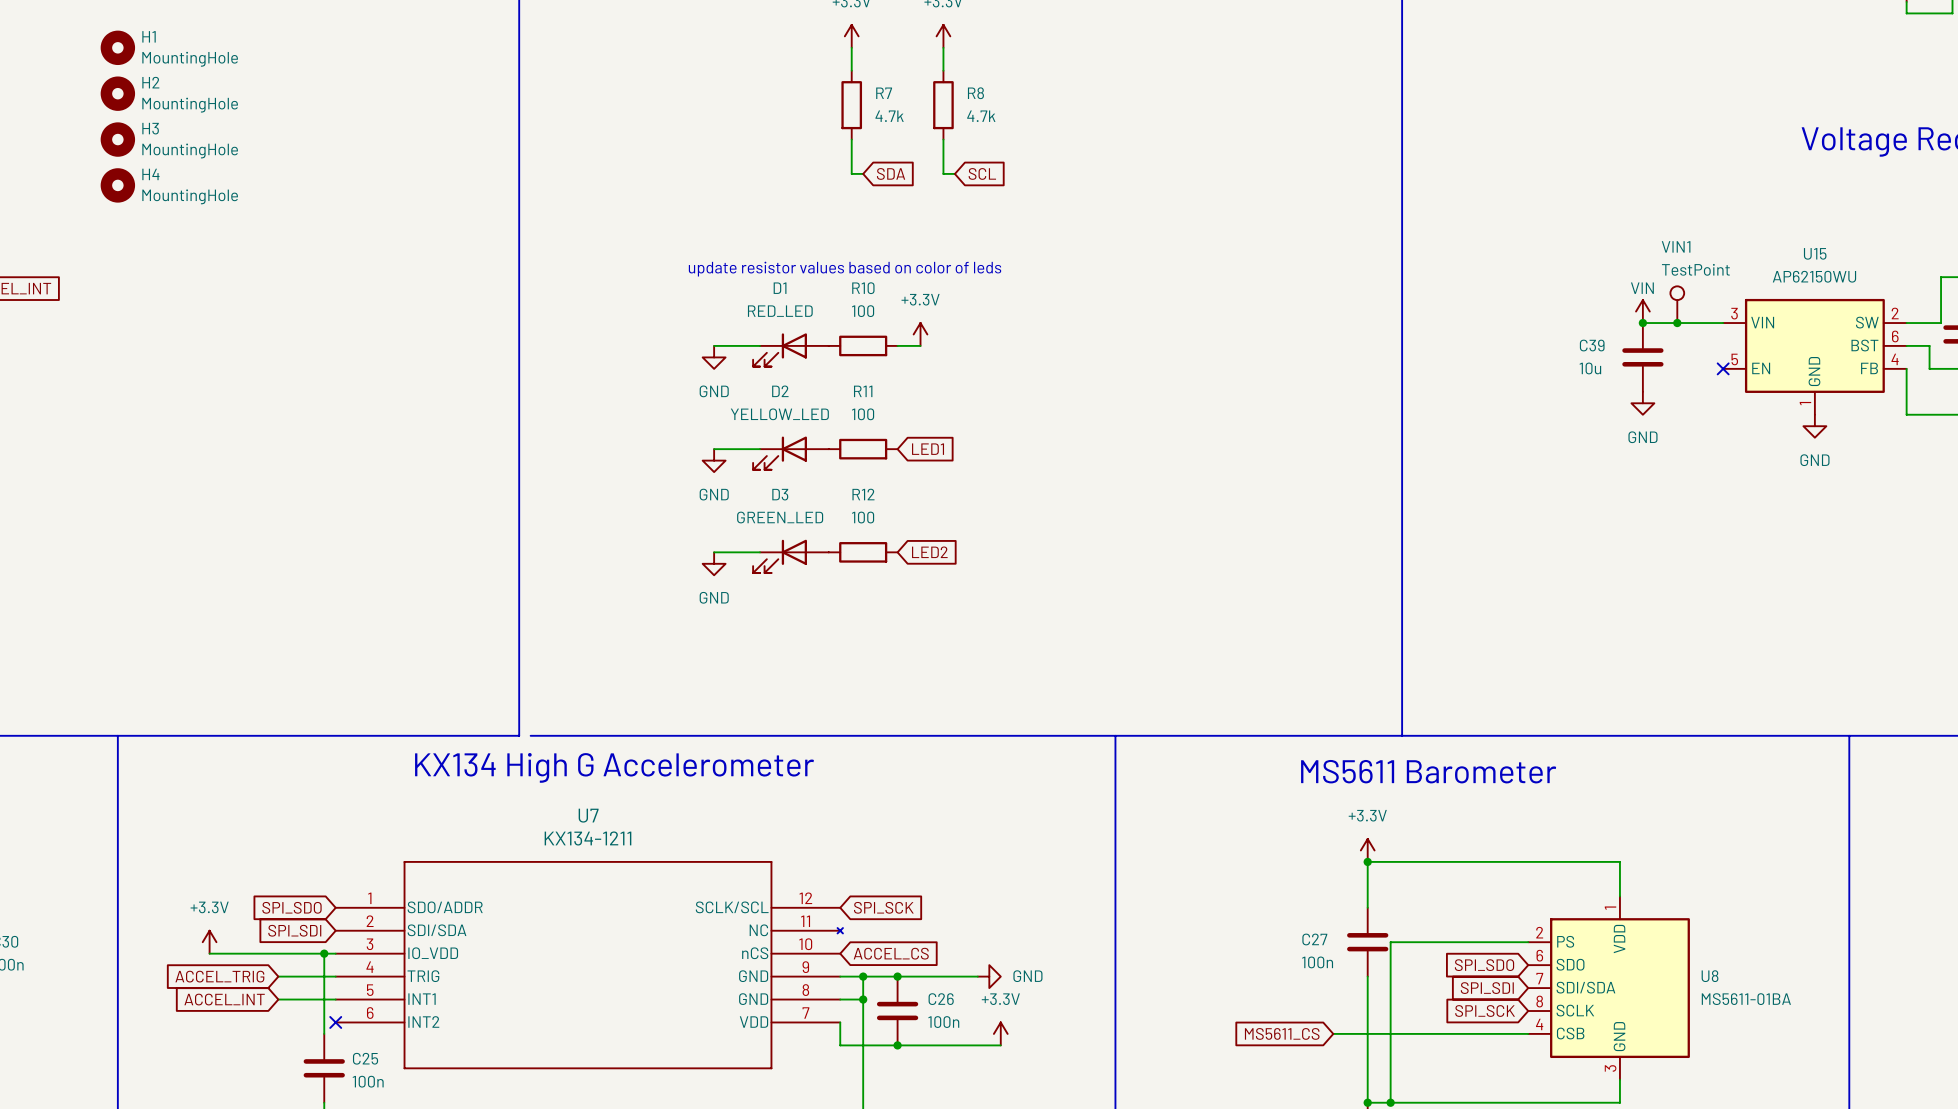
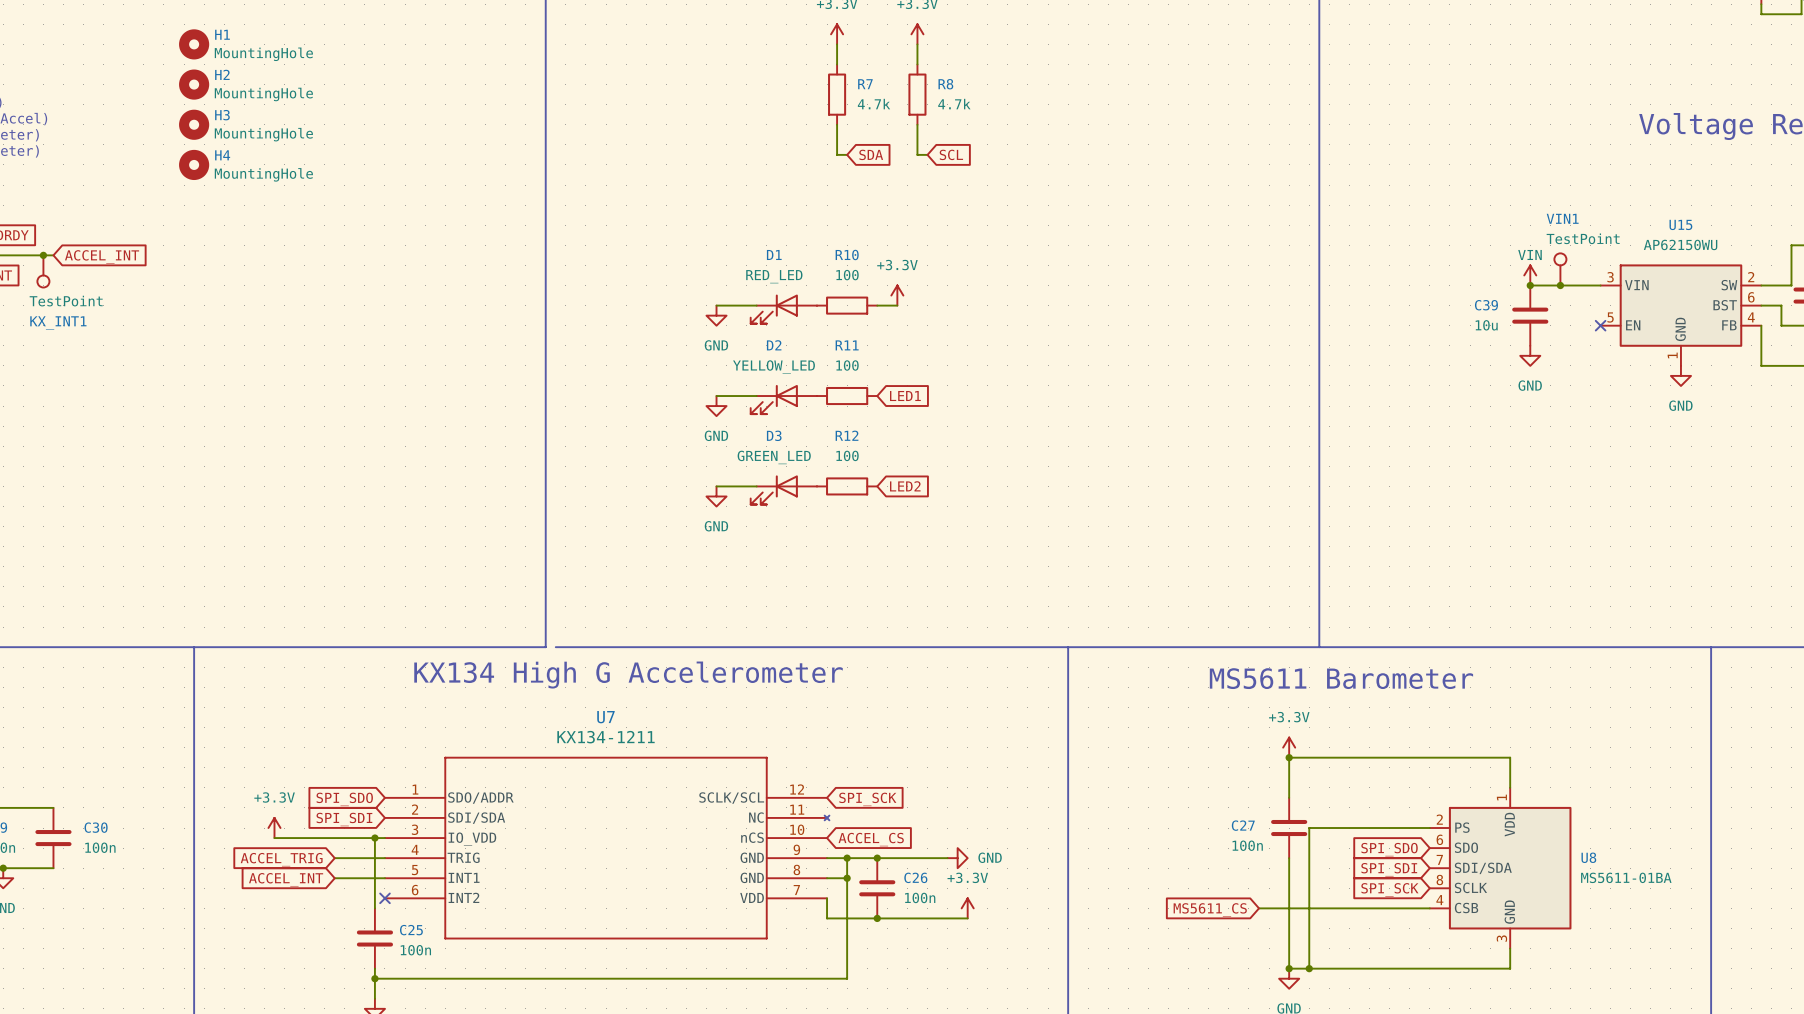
text: update resistor values based on color of leds (845, 269) -> none

